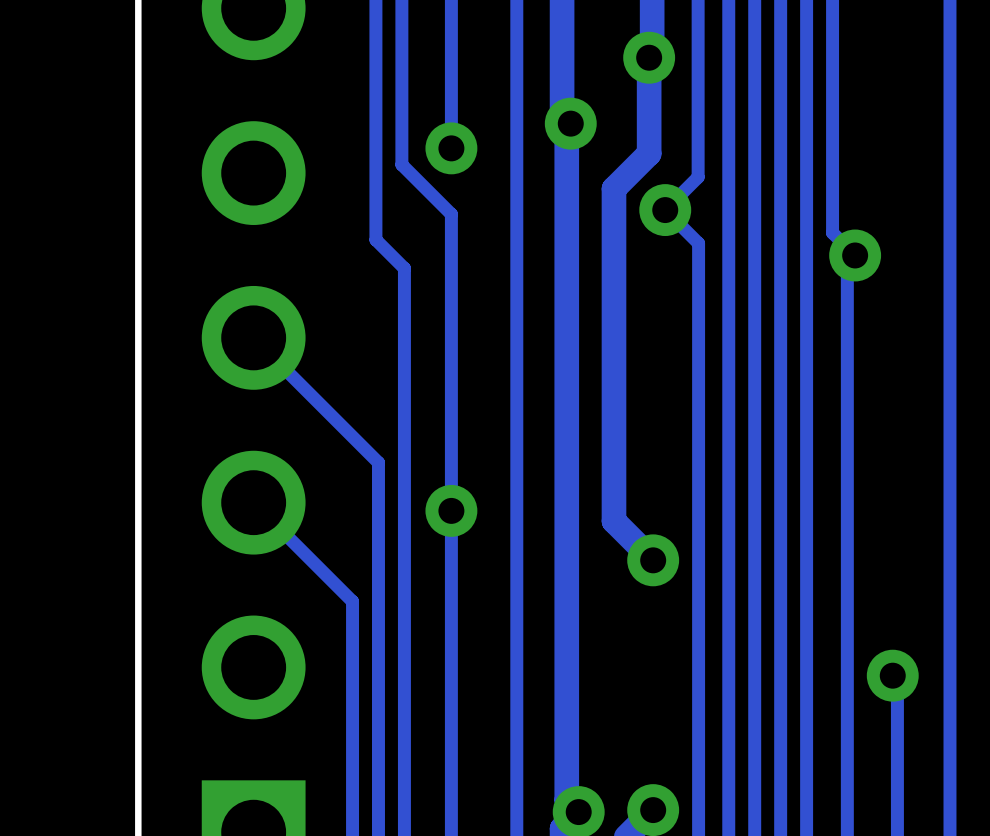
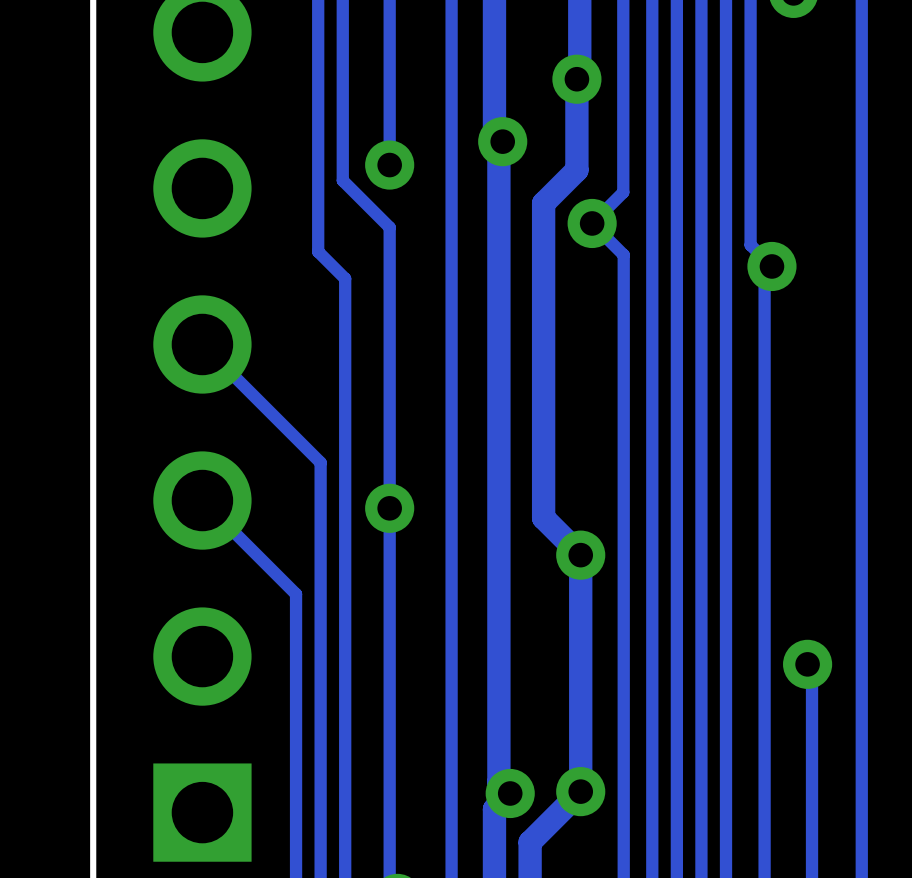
track: none -> (580, 555) (580, 791)

